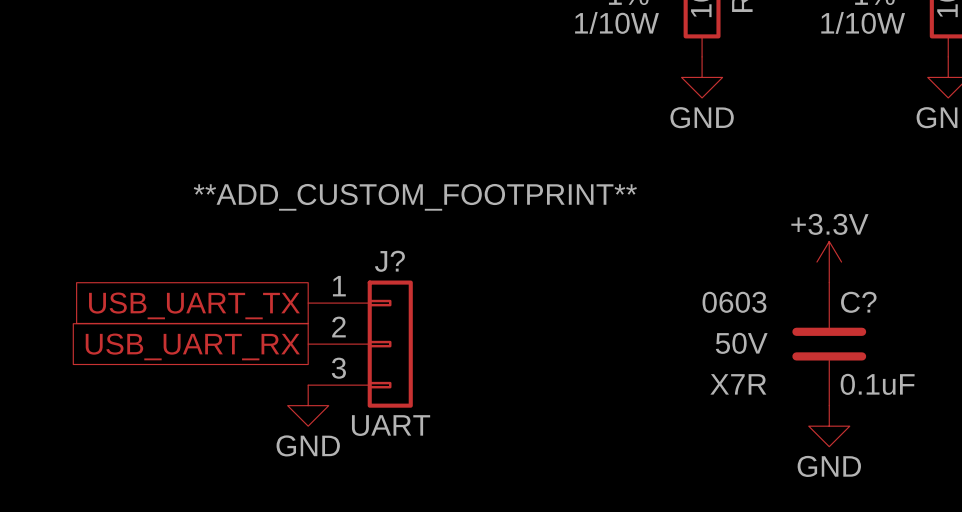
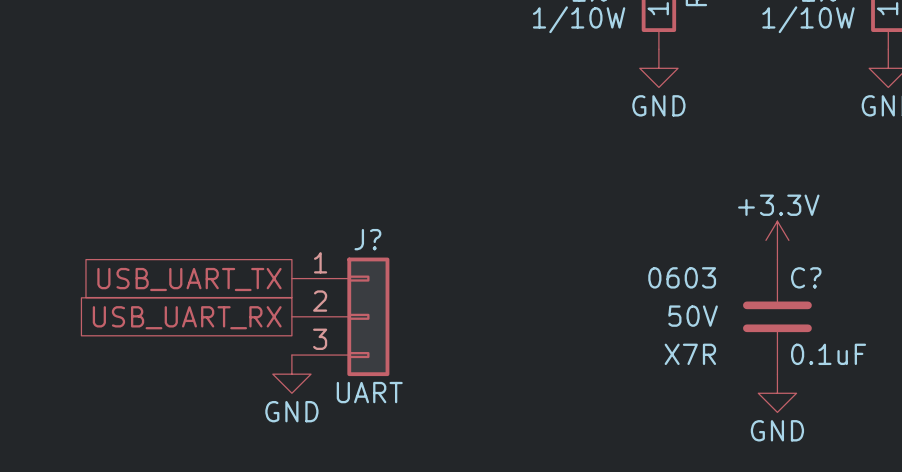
label: **ADD_CUSTOM_FOOTPRINT** (415, 197) -> none

